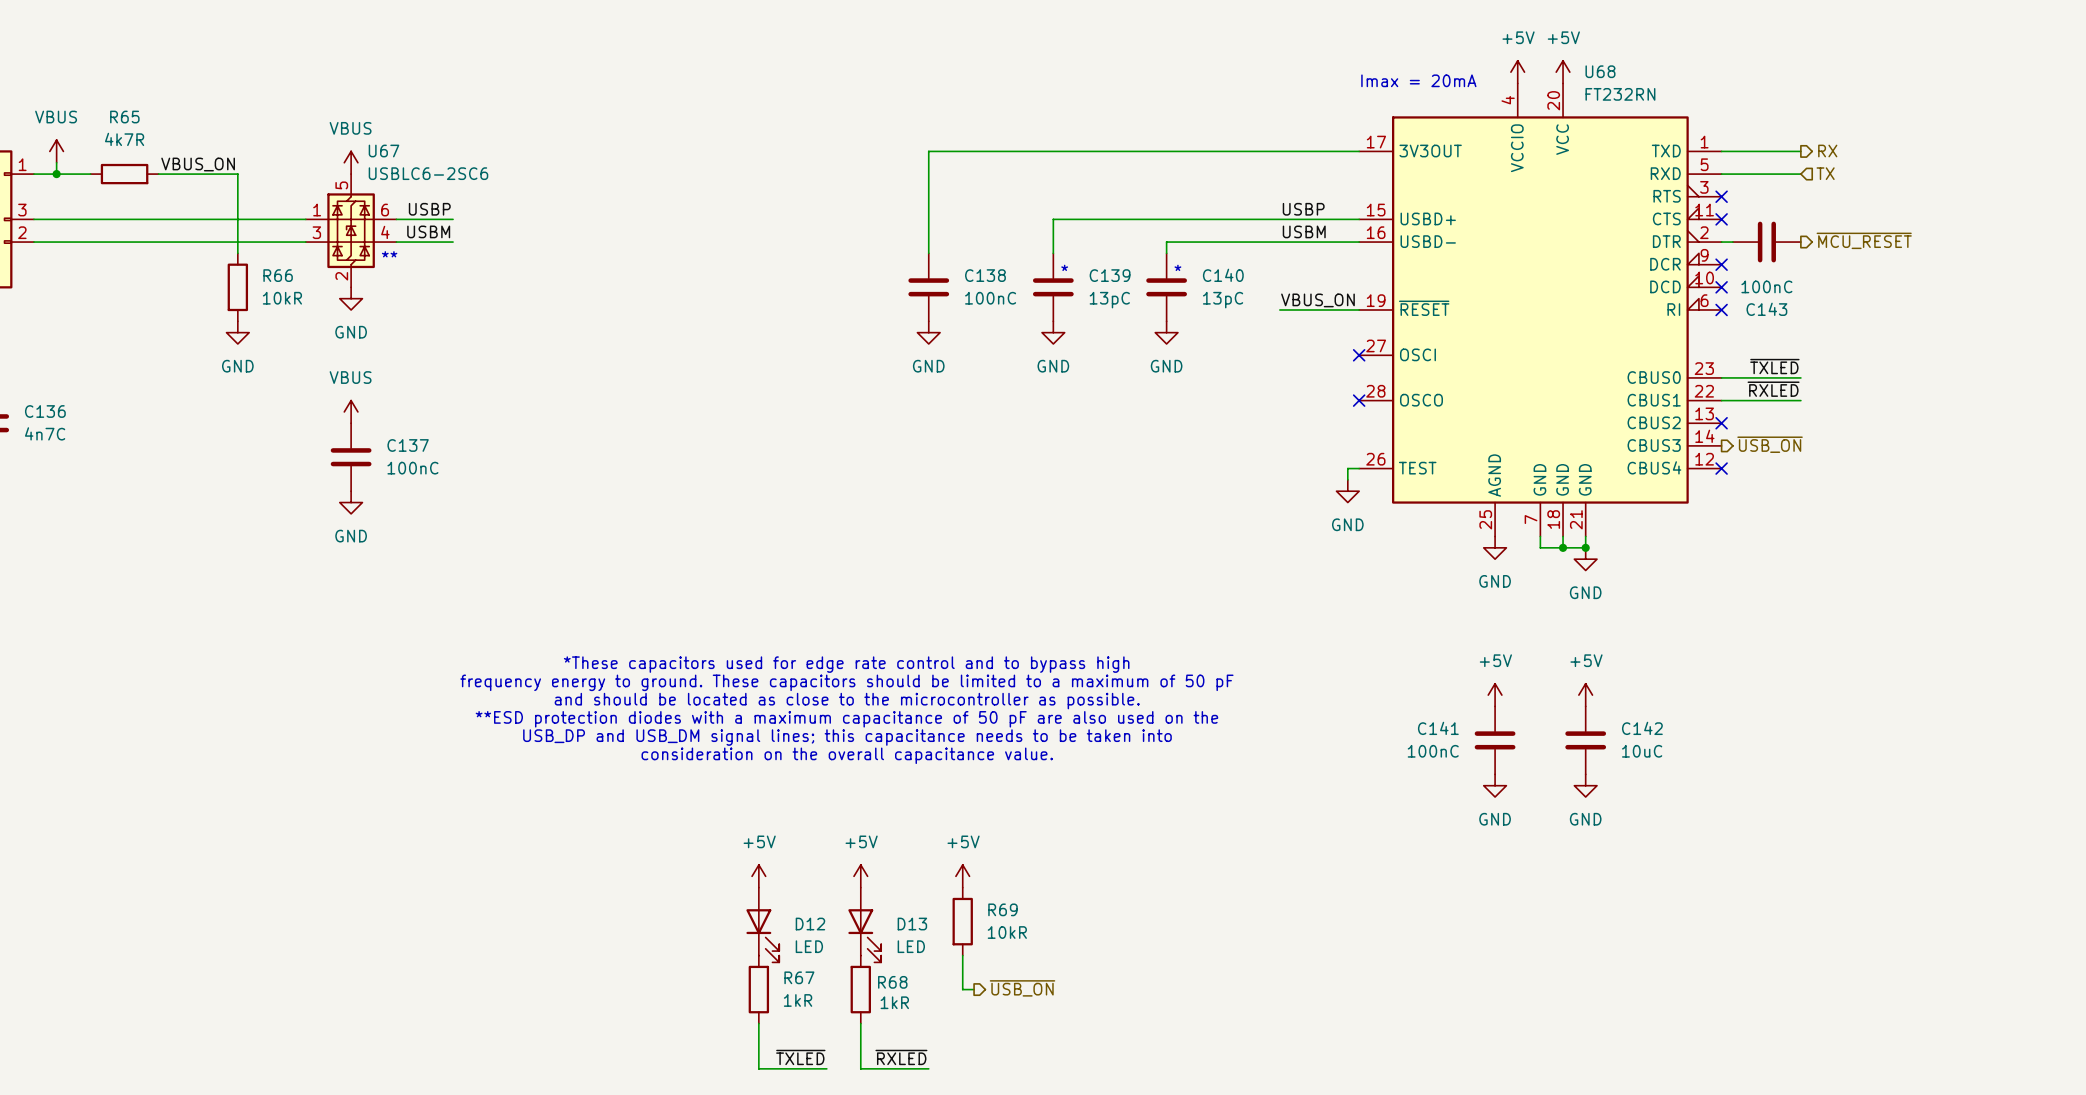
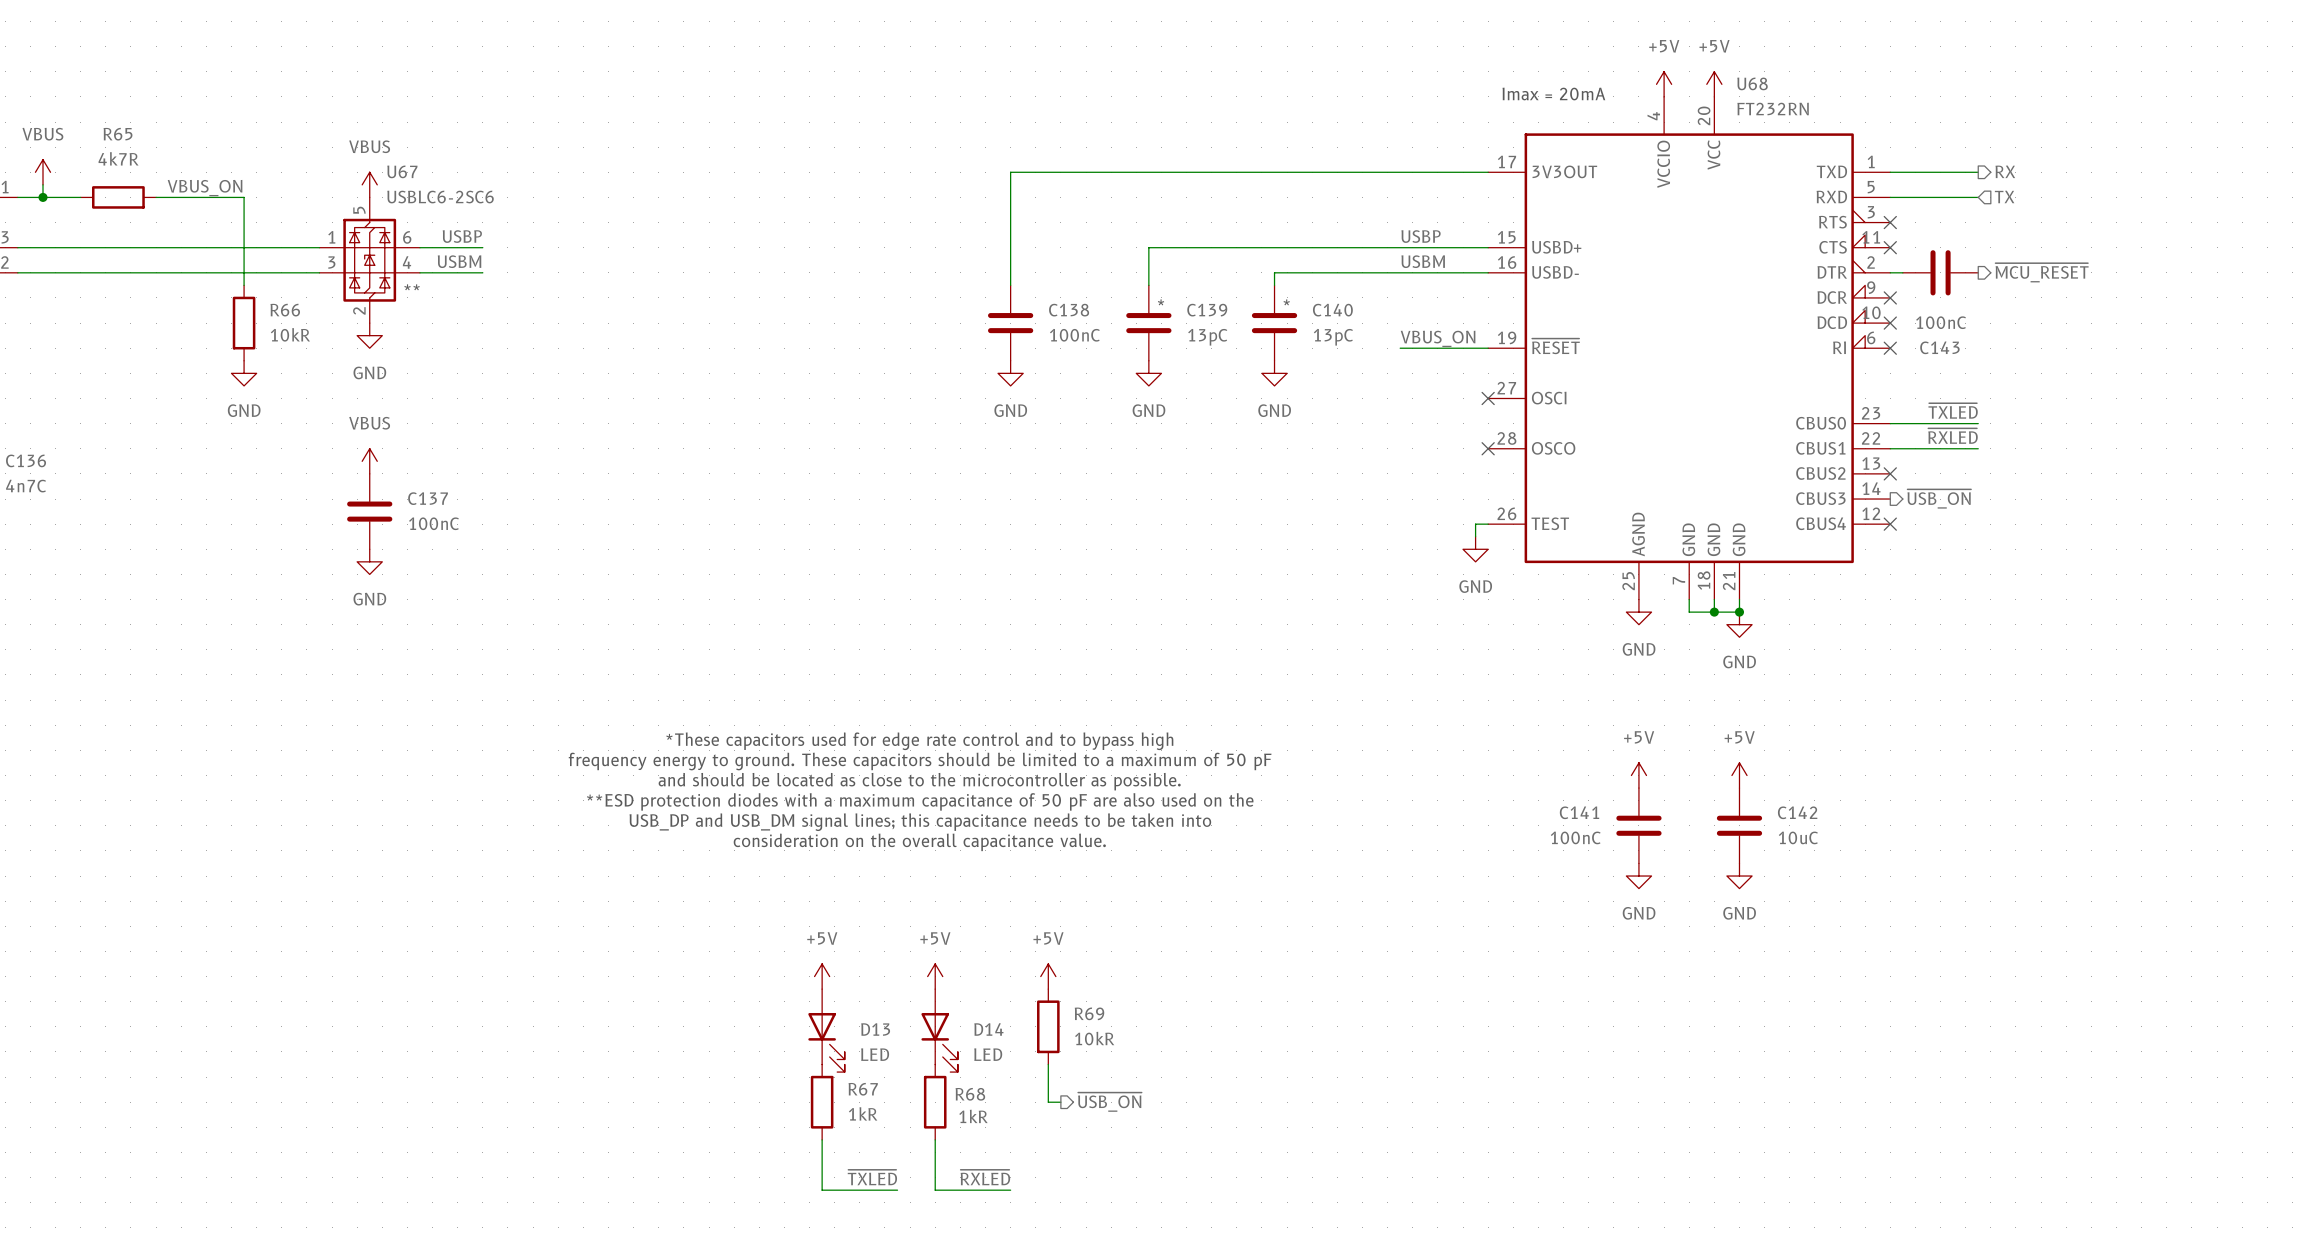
D12 name: D12 (810, 924) -> D13 (875, 1029)
D13 name: D13 (912, 924) -> D14 (988, 1029)

